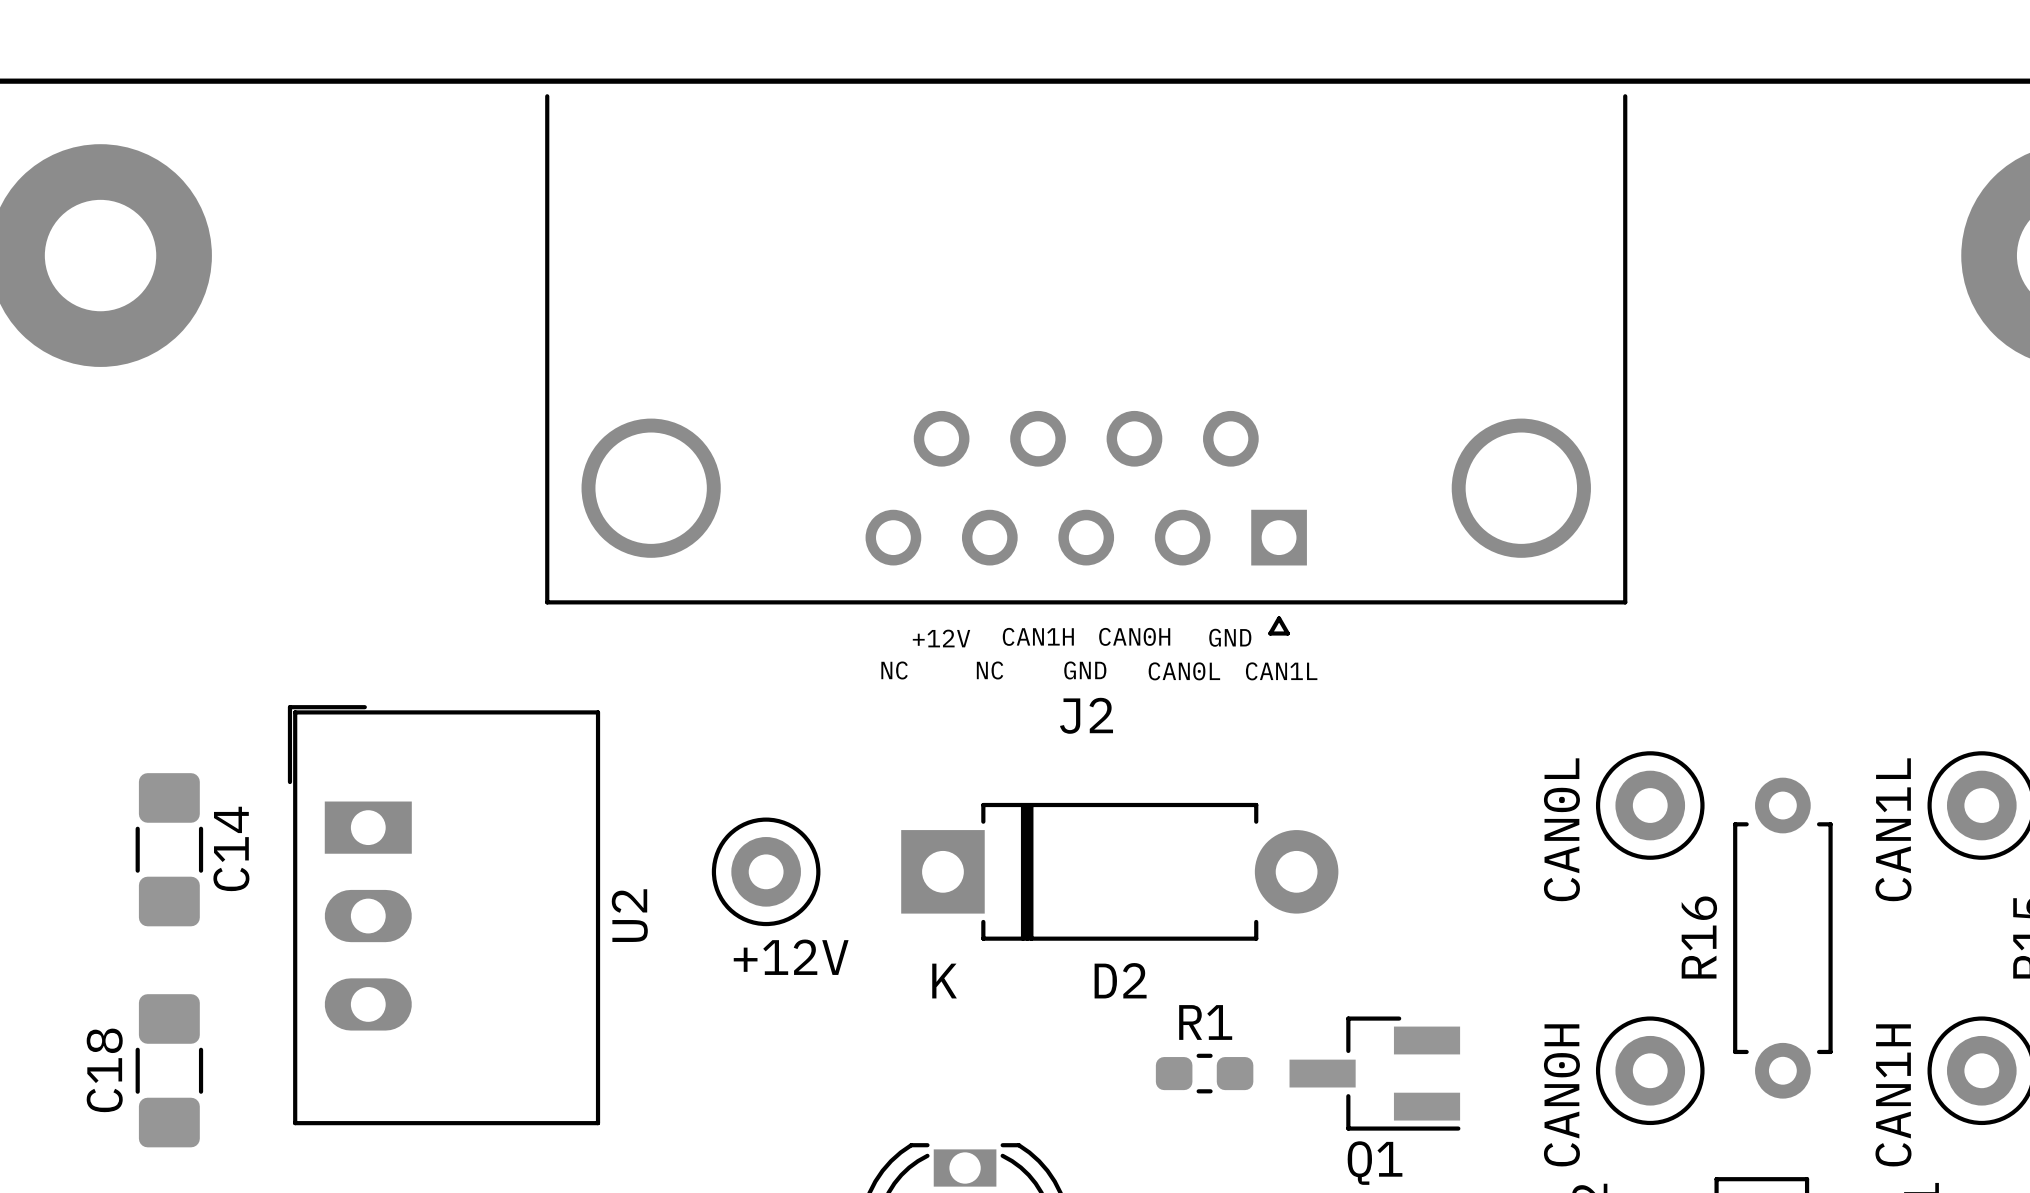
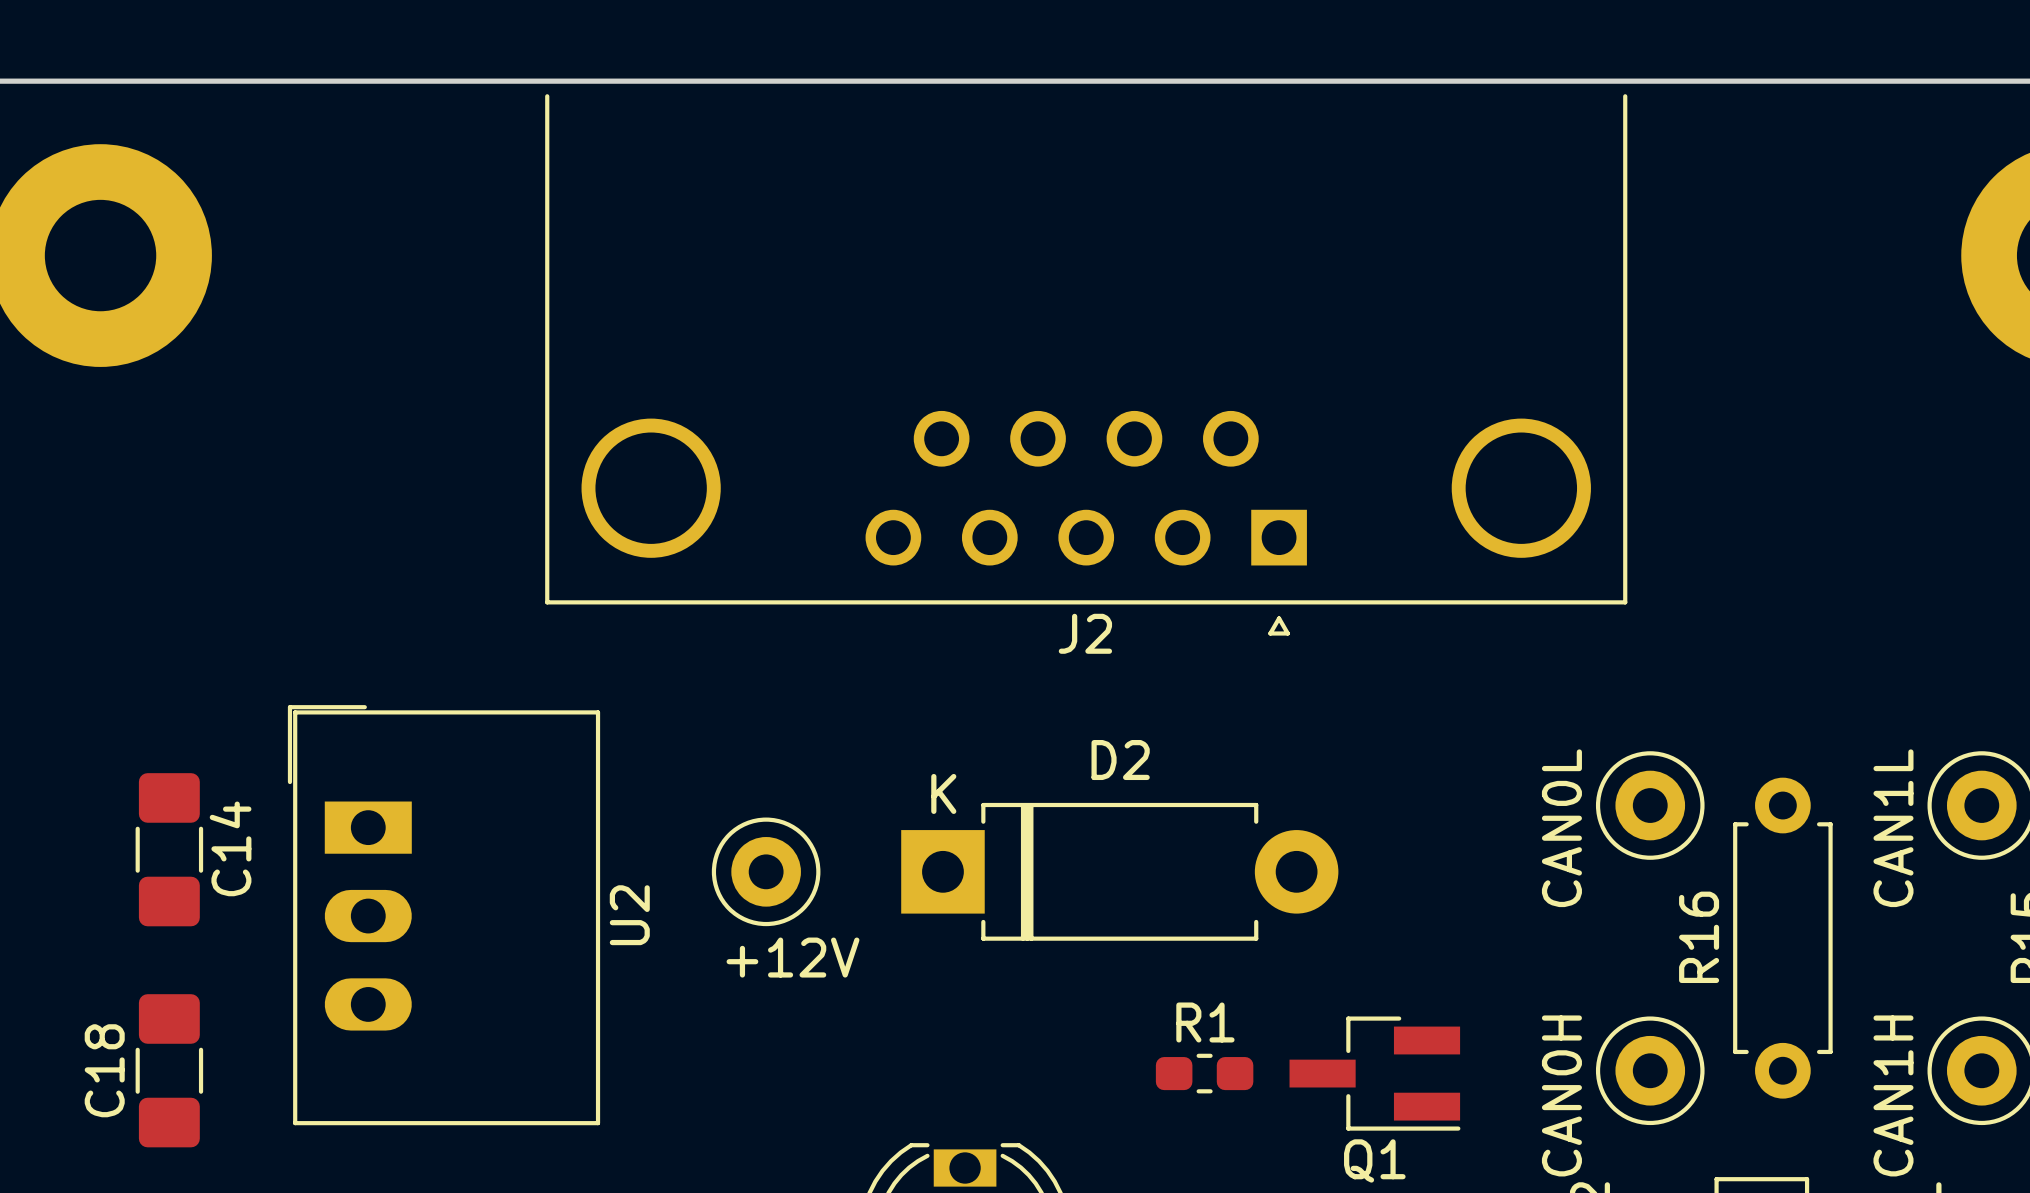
text: CAN1H (1038, 636) -> none
text: CAN0H (1134, 636) -> none
text: GND (1230, 637) -> none
text: +12V (941, 638) -> none
text: NC (894, 670) -> none
text: NC (990, 670) -> none
text: GND (1085, 670) -> none
text: CAN0L (1184, 671) -> none
text: CAN1L (1281, 671) -> none
J2 name position: J2 (1086, 715) -> J2 (1085, 633)
D2 name position: D2 (1120, 980) -> D2 (1120, 760)
D2 text position: K (944, 981) -> K (943, 793)

